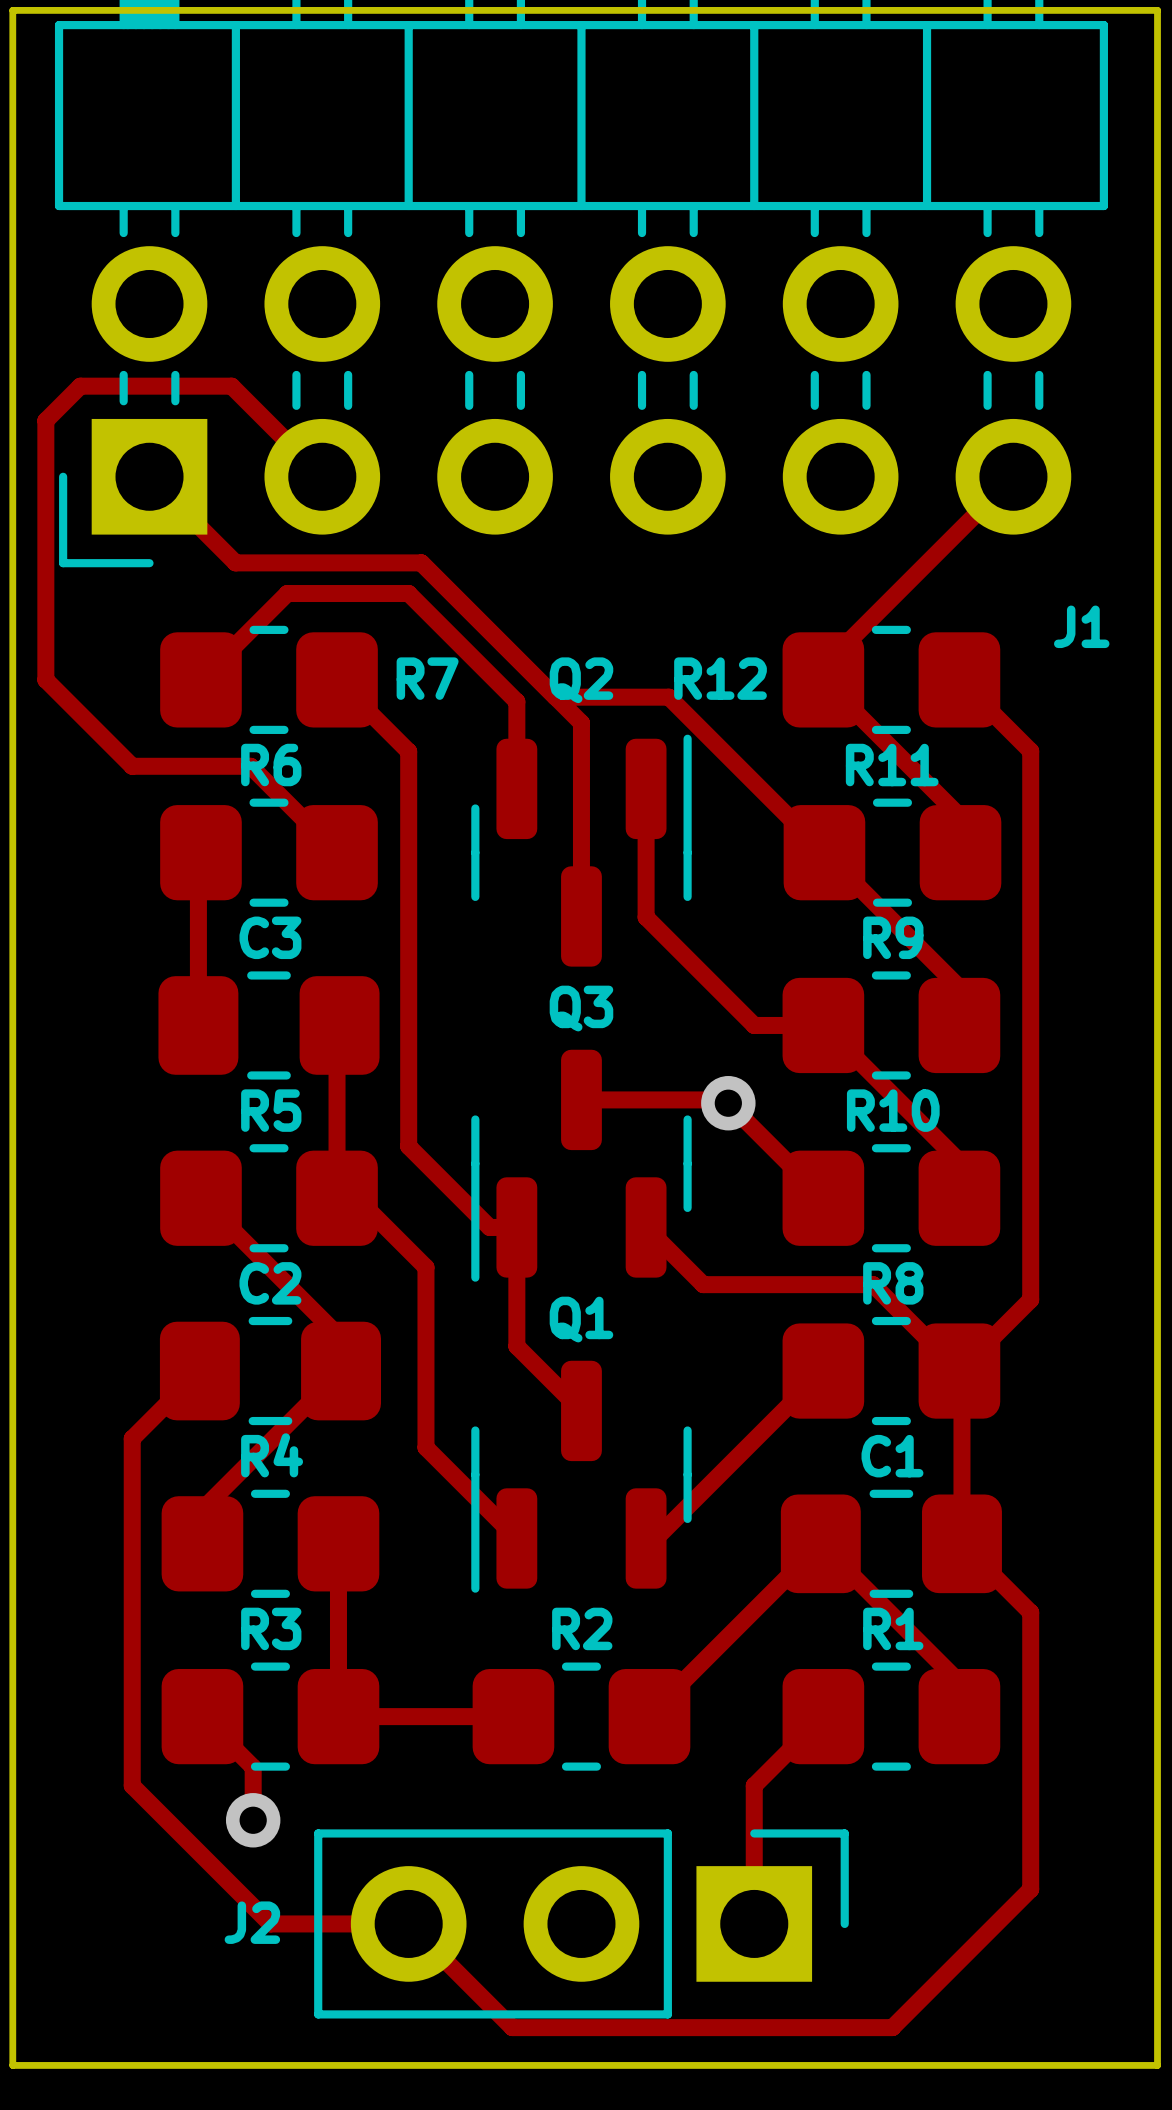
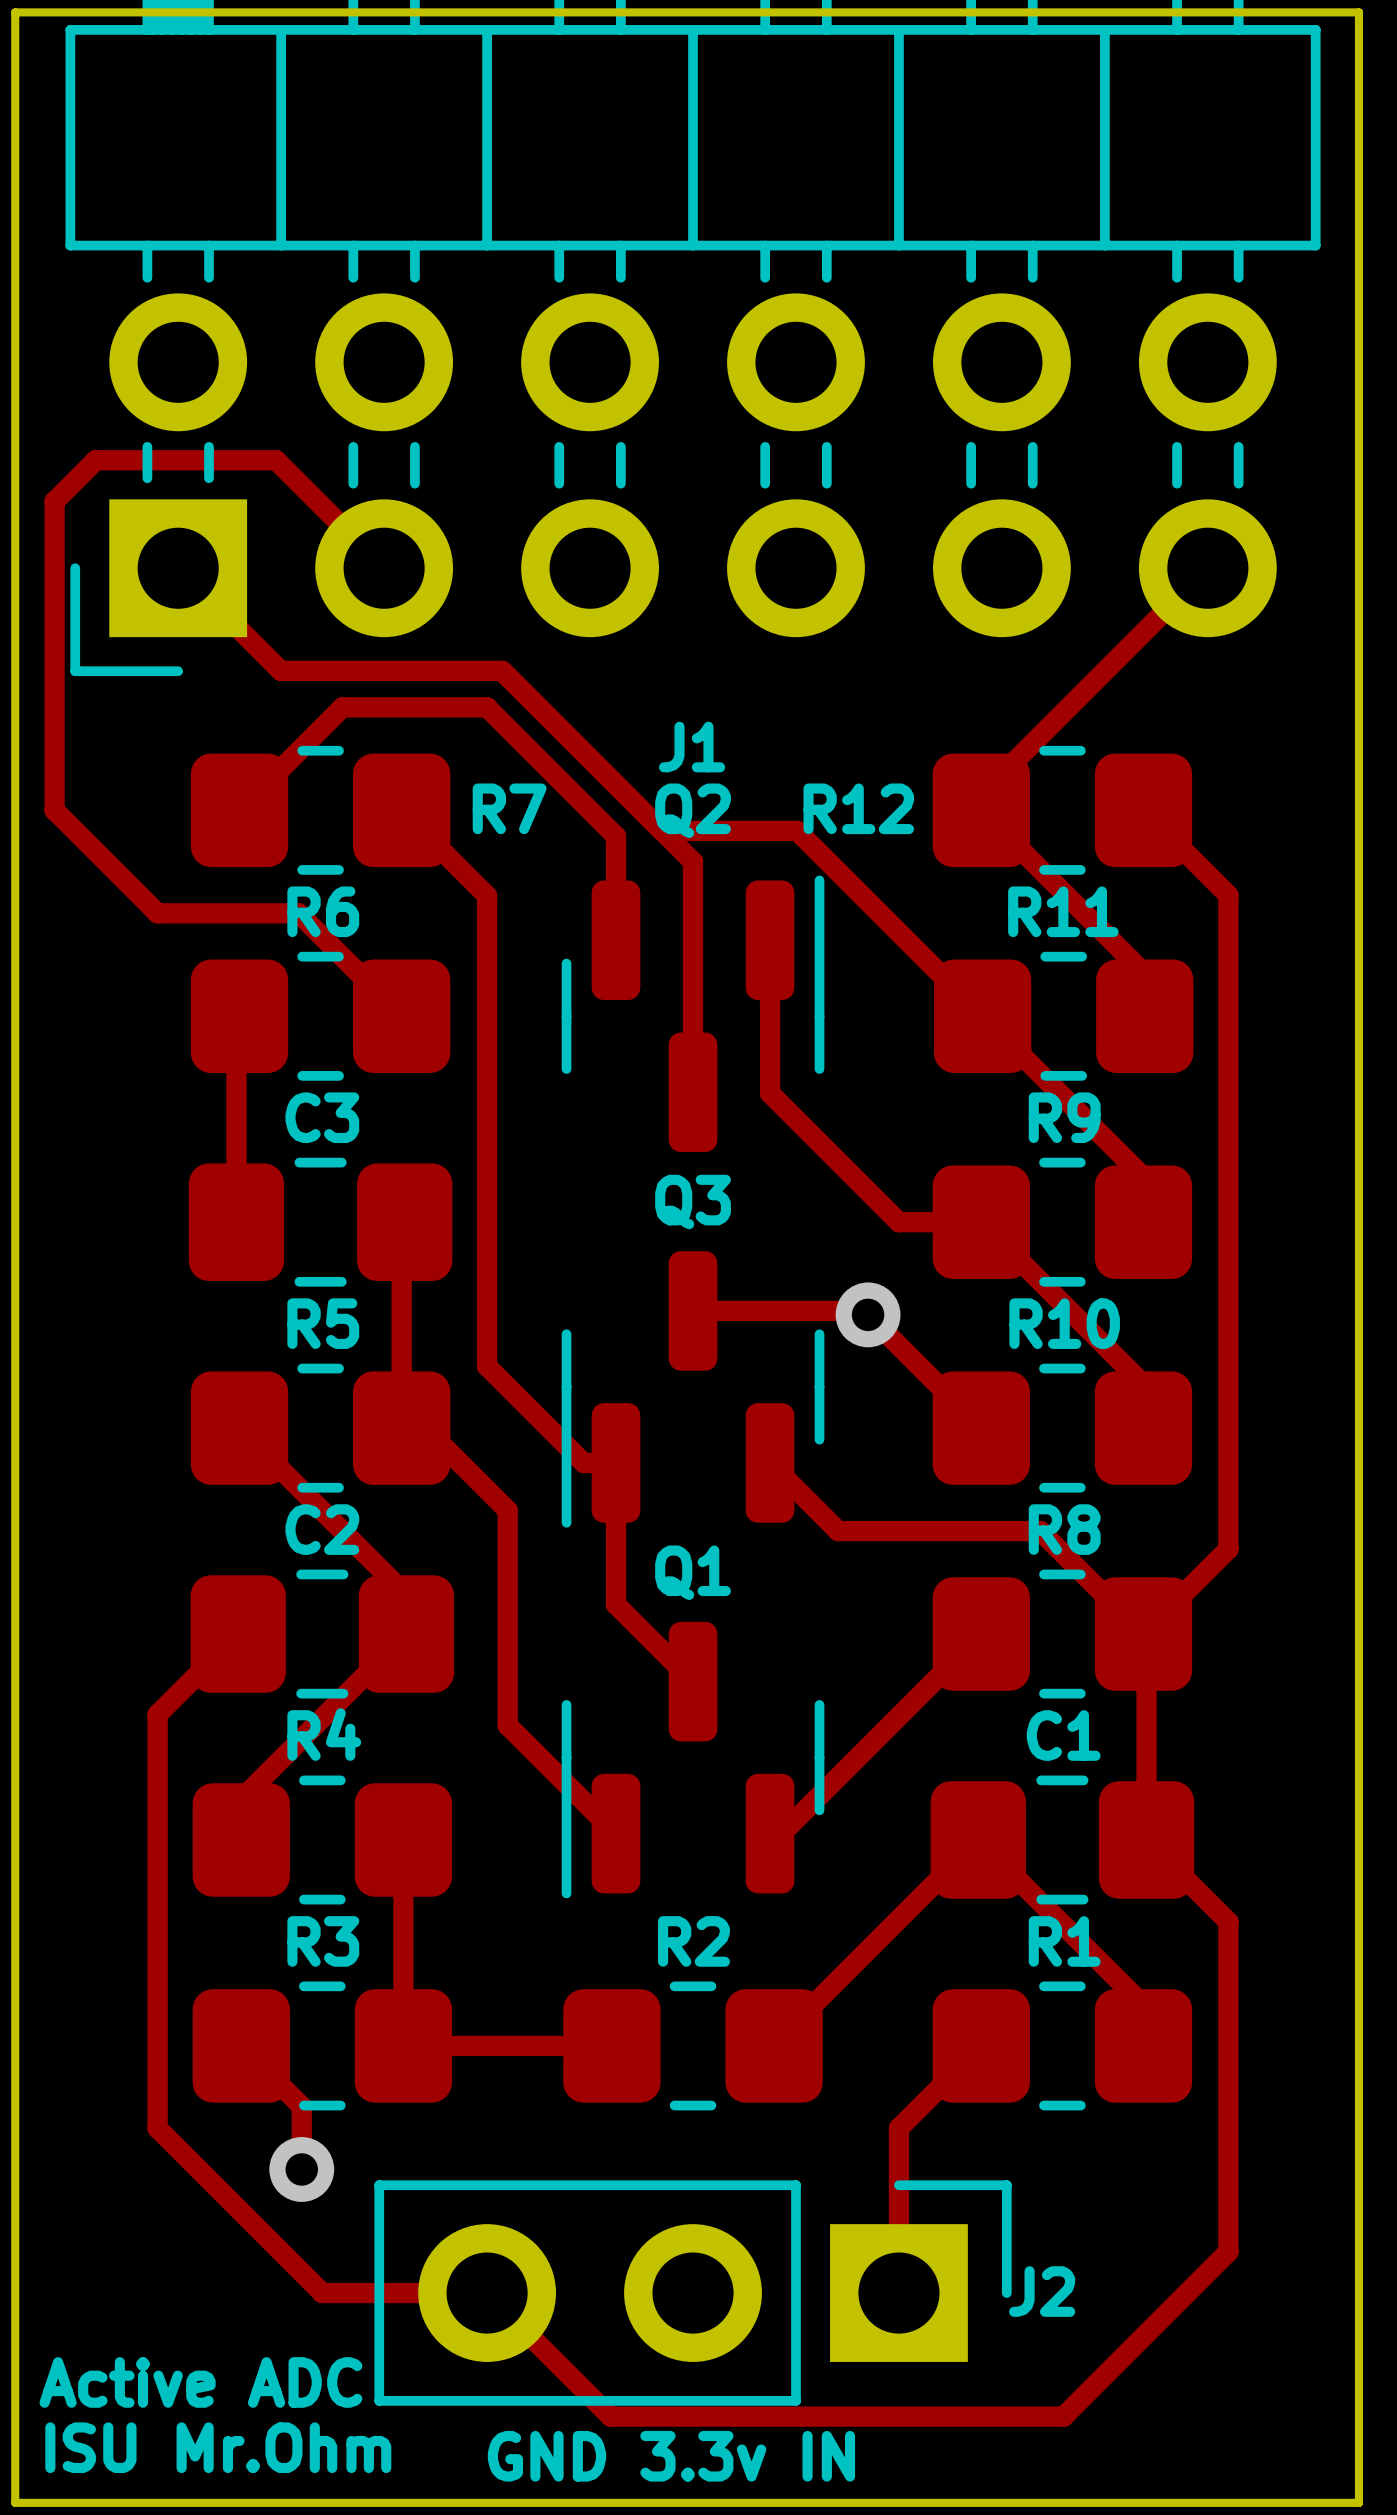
board edge: (1140, 10) (1157, 10) (1157, 2065) (12, 2065) -> (1358, 12) (1358, 2502) (15, 2502) (15, 2461)
J1 name position: J1 (1081, 626) -> J1 (692, 747)
J2 name position: J2 (252, 1922) -> J2 (1042, 2291)
text: none -> Active ADC (200, 2382)
text: none -> ISU Mr.Ohm (218, 2447)
text: none -> GND 3.3v IN (671, 2456)

